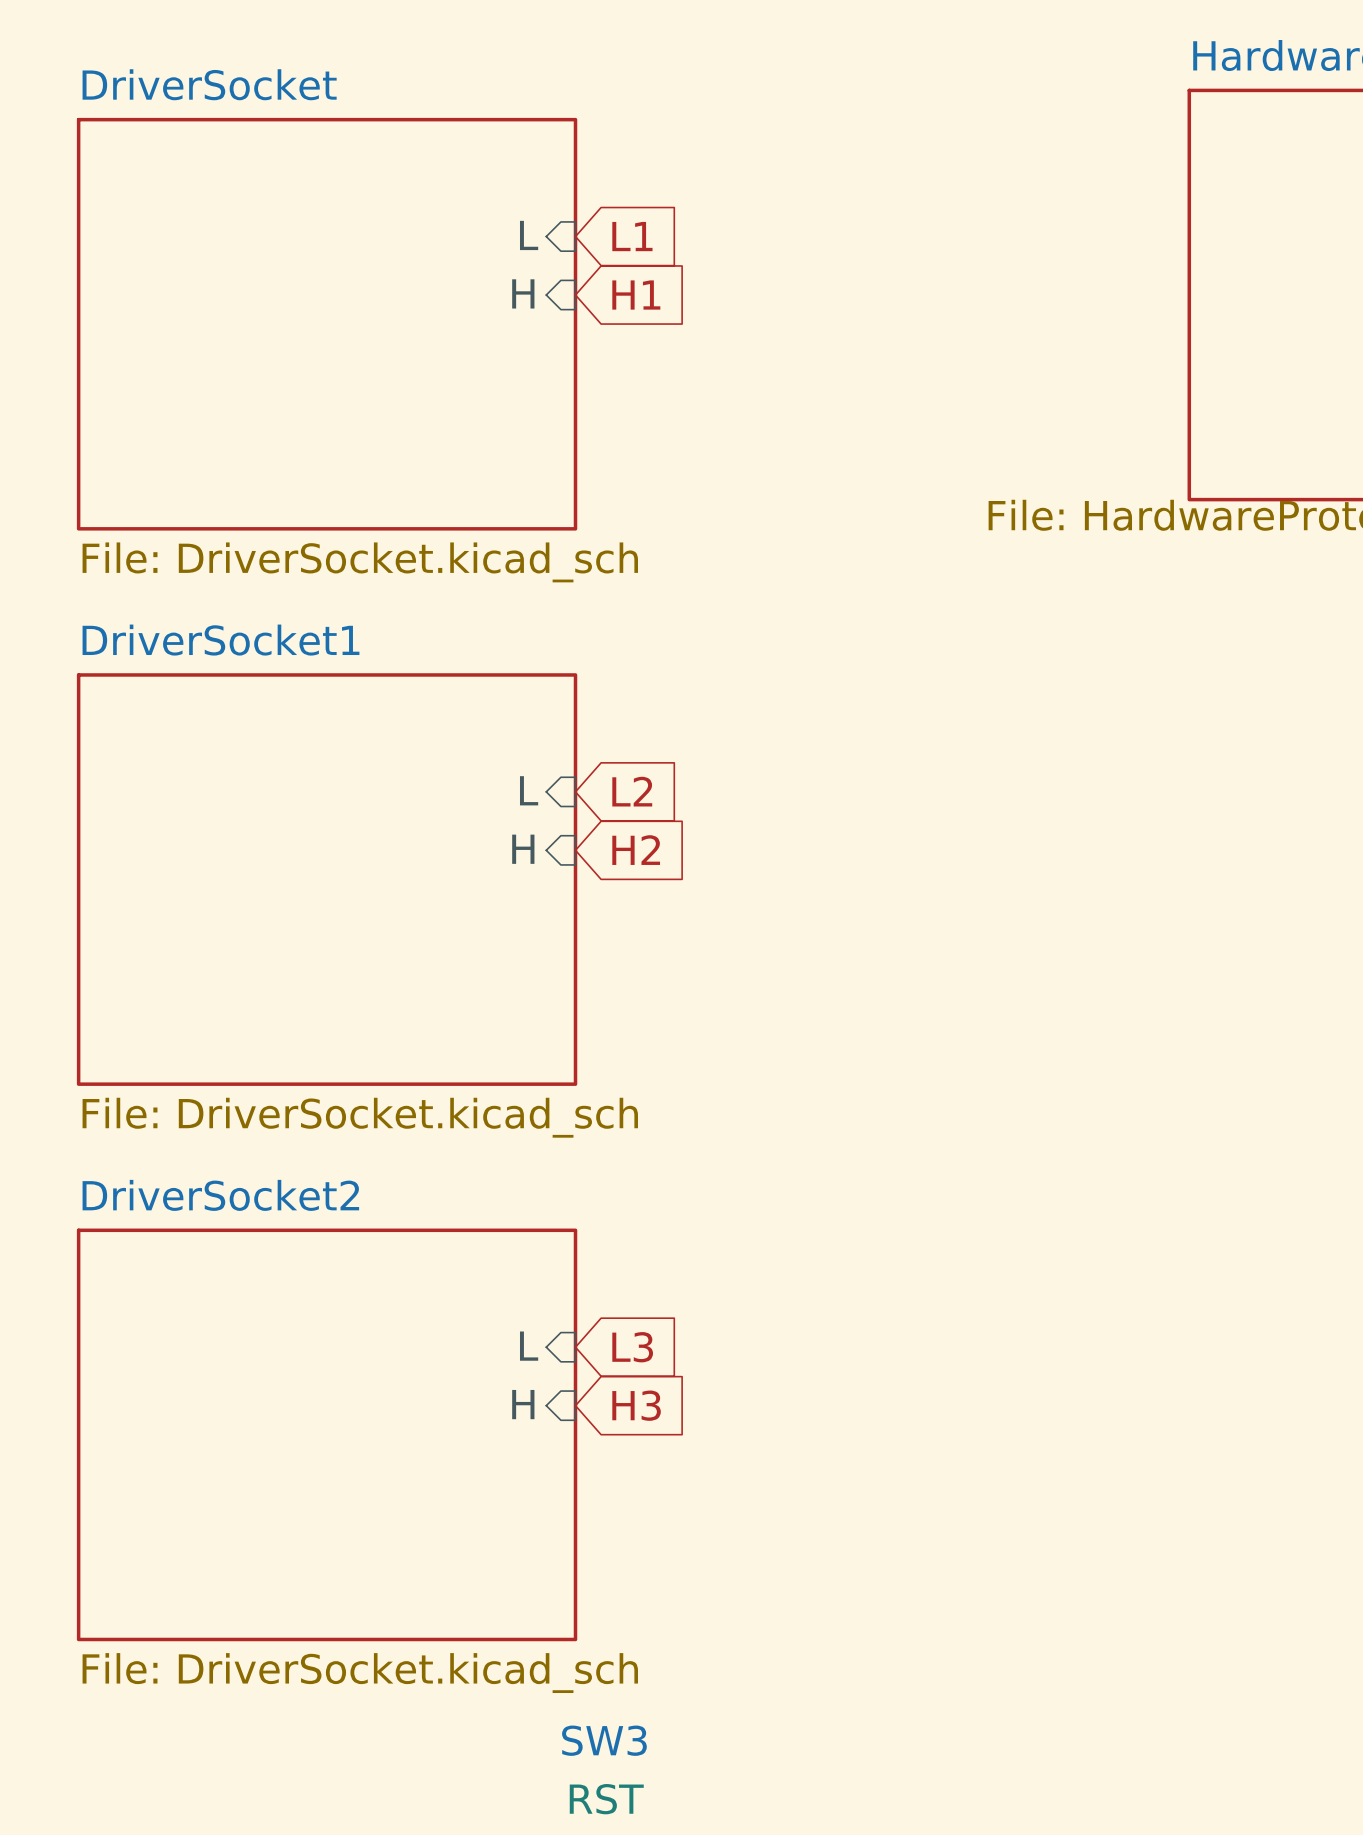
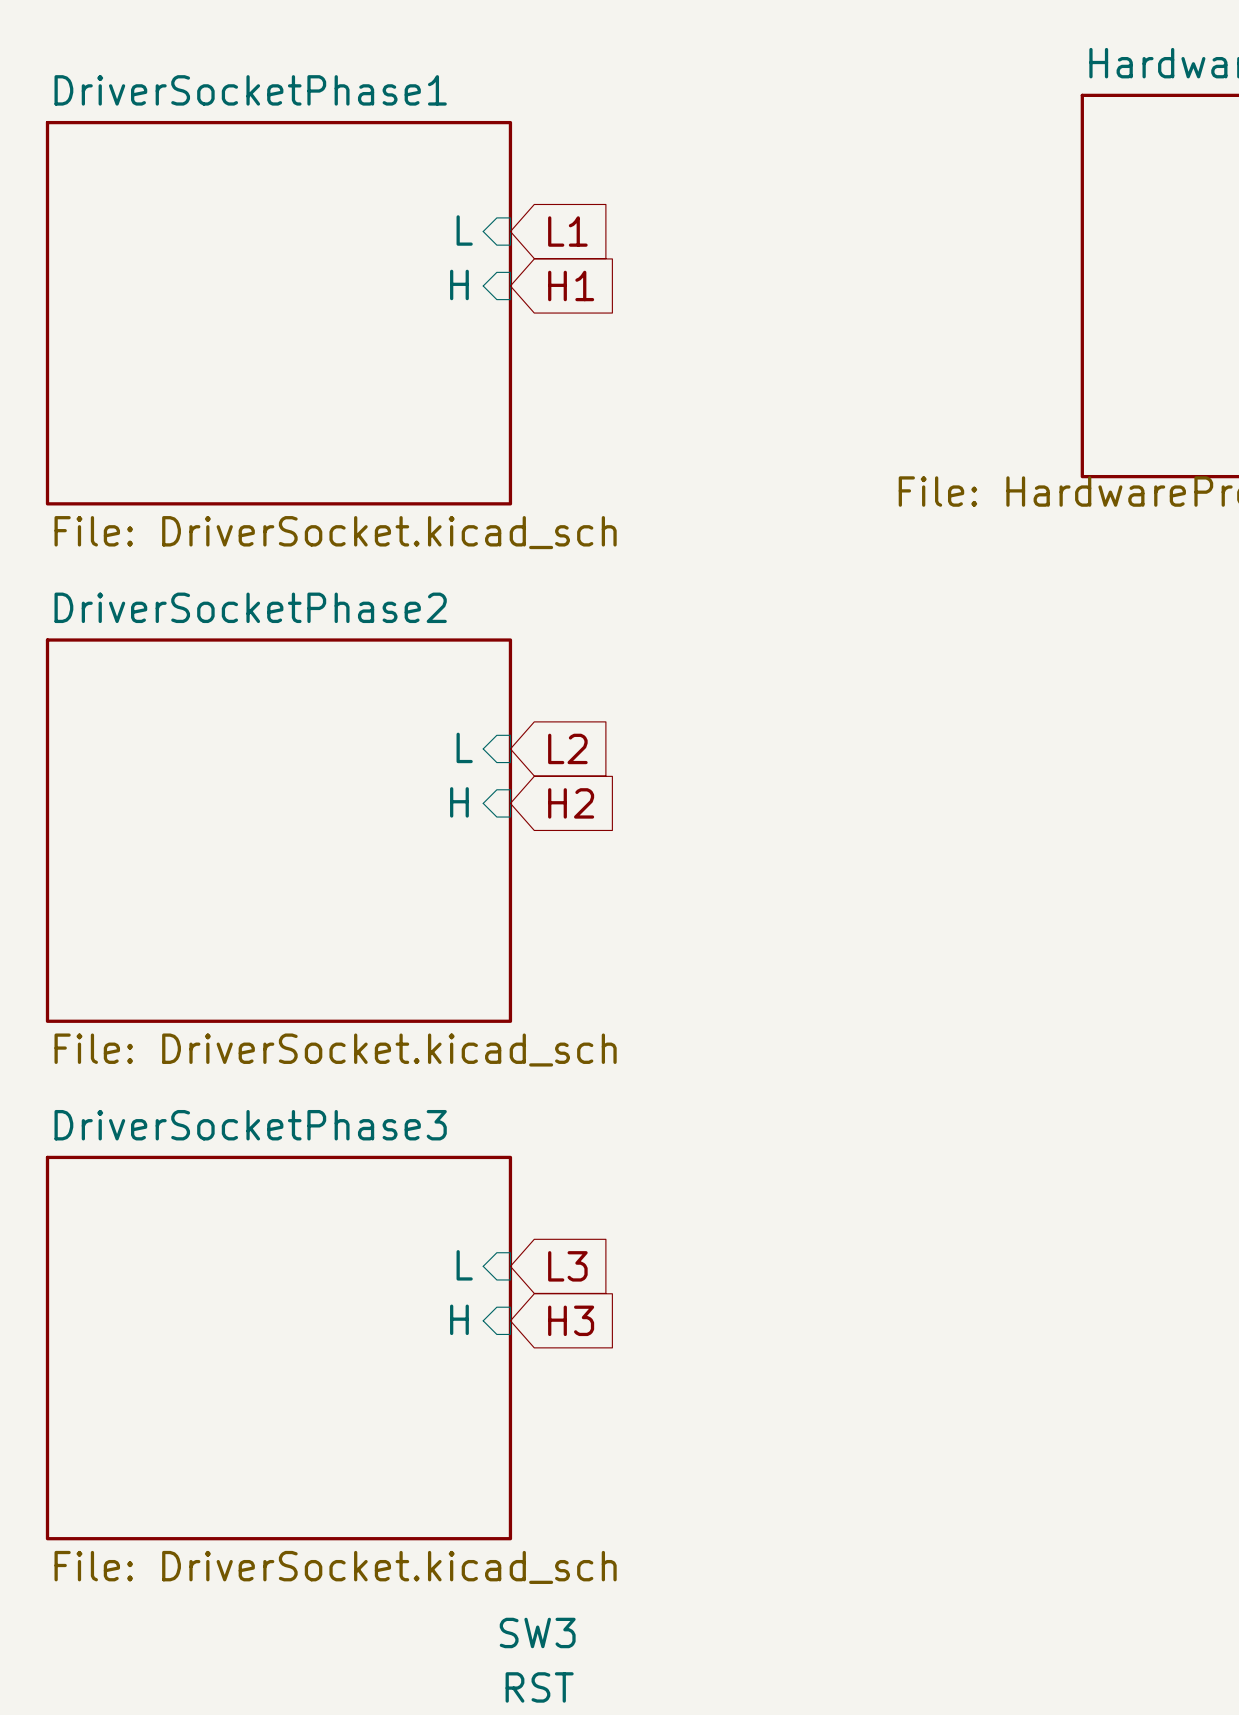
sheet DriverSocket name: DriverSocket (209, 84) -> DriverSocketPhase1 (250, 90)
sheet DriverSocket1 name: DriverSocket1 (220, 640) -> DriverSocketPhase2 (250, 607)
sheet DriverSocket2 name: DriverSocket2 (220, 1195) -> DriverSocketPhase3 (250, 1125)

